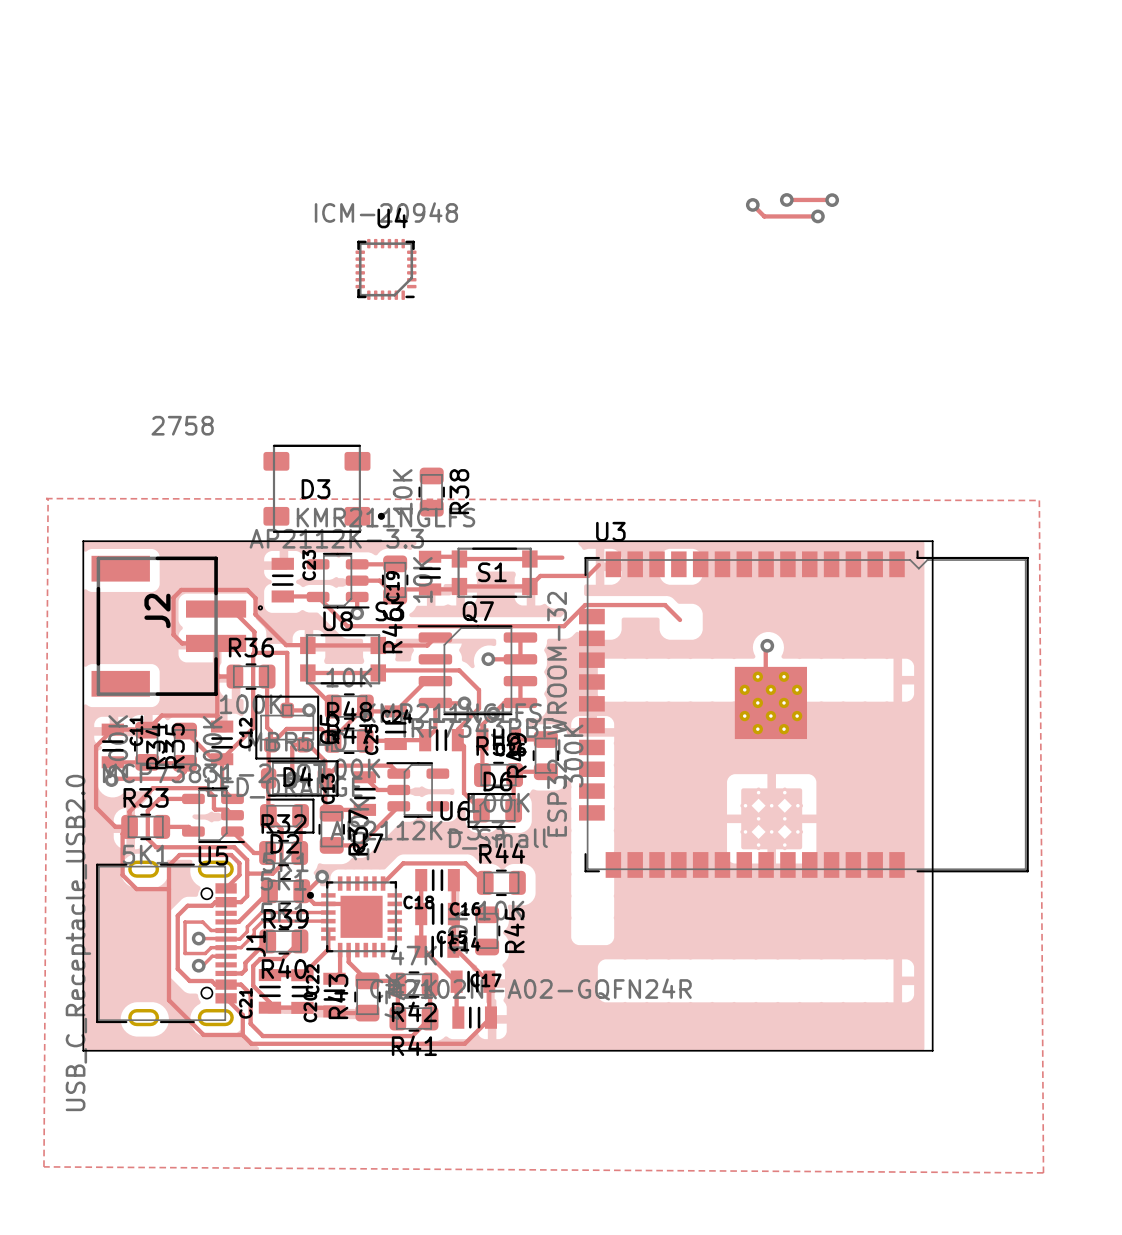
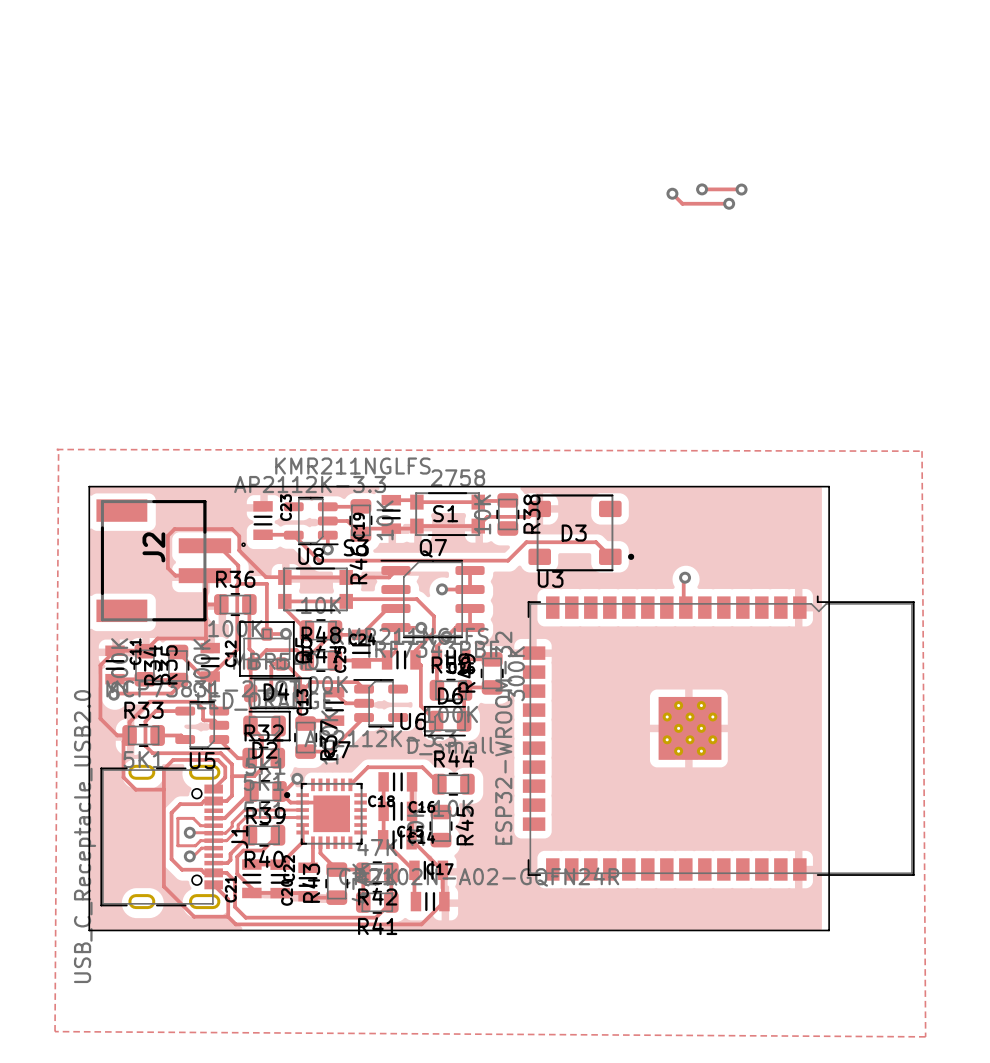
U4: ICM-20948 (386, 269) -> none
D3 position: (324, 488) -> (581, 532)
R38 position: (431, 492) -> (507, 514)
U3 position: (803, 714) -> (718, 738)

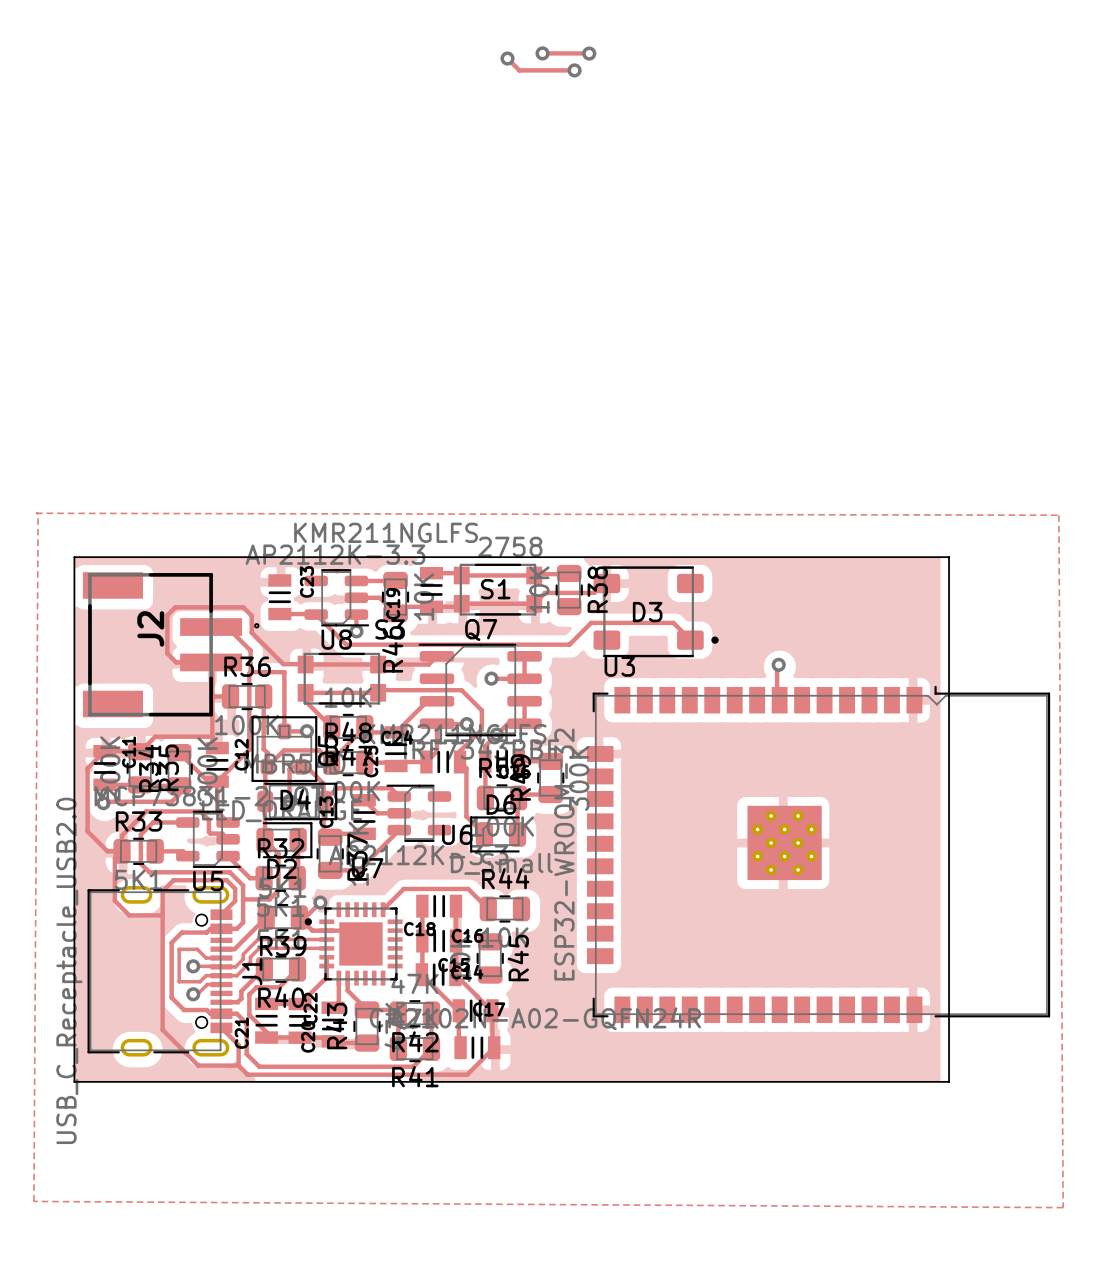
via: none -> (542, 53)
via: none -> (589, 53)
via: none -> (507, 58)
via: none -> (574, 70)
track: (702, 189) (741, 189) -> (542, 53) (589, 53)
via: (702, 189) -> none
via: (741, 189) -> none
track: (672, 193) (682, 203) (729, 203) -> (507, 58) (519, 70) (574, 70)
via: (672, 193) -> none
via: (729, 203) -> none

